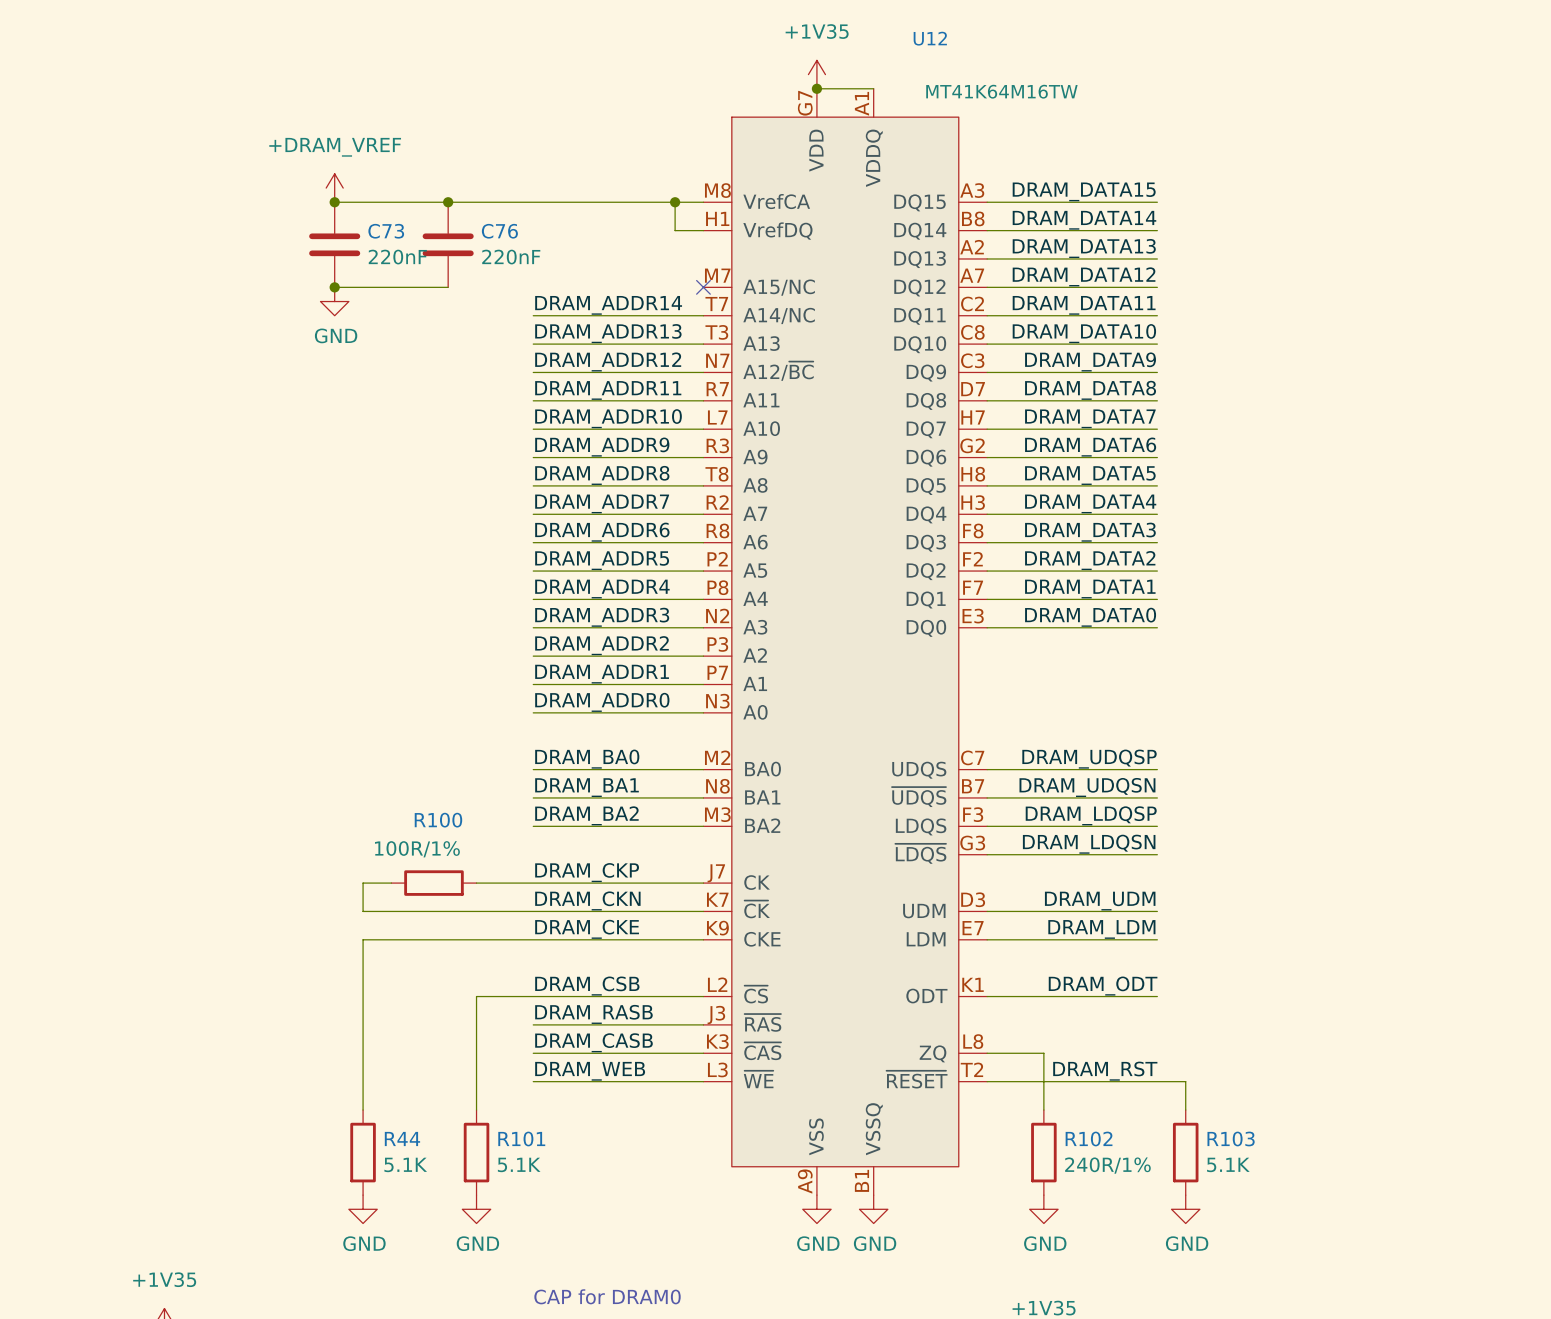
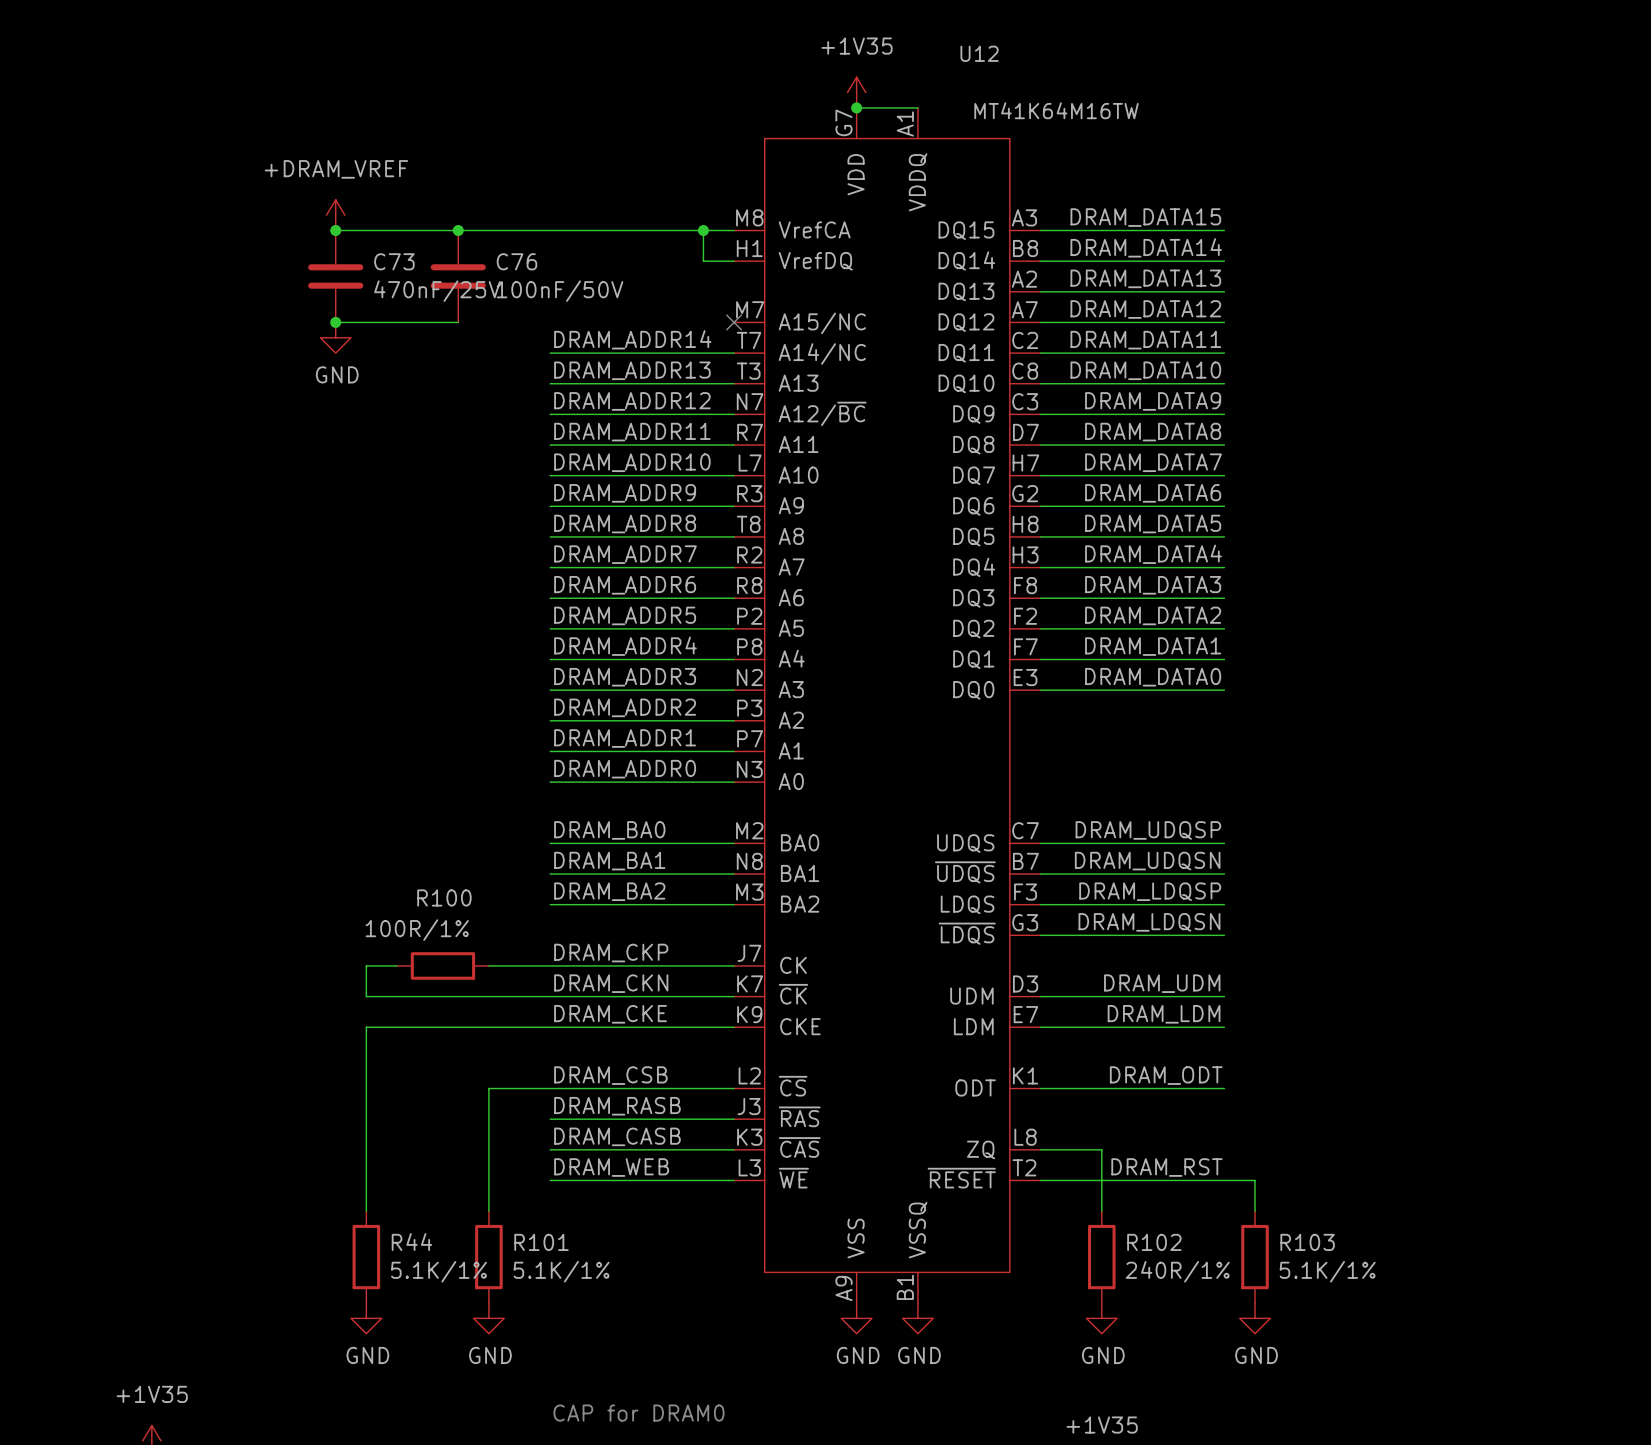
C73 value: 220nF (397, 257) -> 470nF/25V (437, 291)
C76 value: 220nF (511, 257) -> 100nF/50V (560, 291)
R44 value: 5.1K (405, 1164) -> 5.1K/1% (438, 1271)
R101 value: 5.1K (519, 1164) -> 5.1K/1% (561, 1271)
R103 value: 5.1K (1228, 1164) -> 5.1K/1% (1327, 1271)

